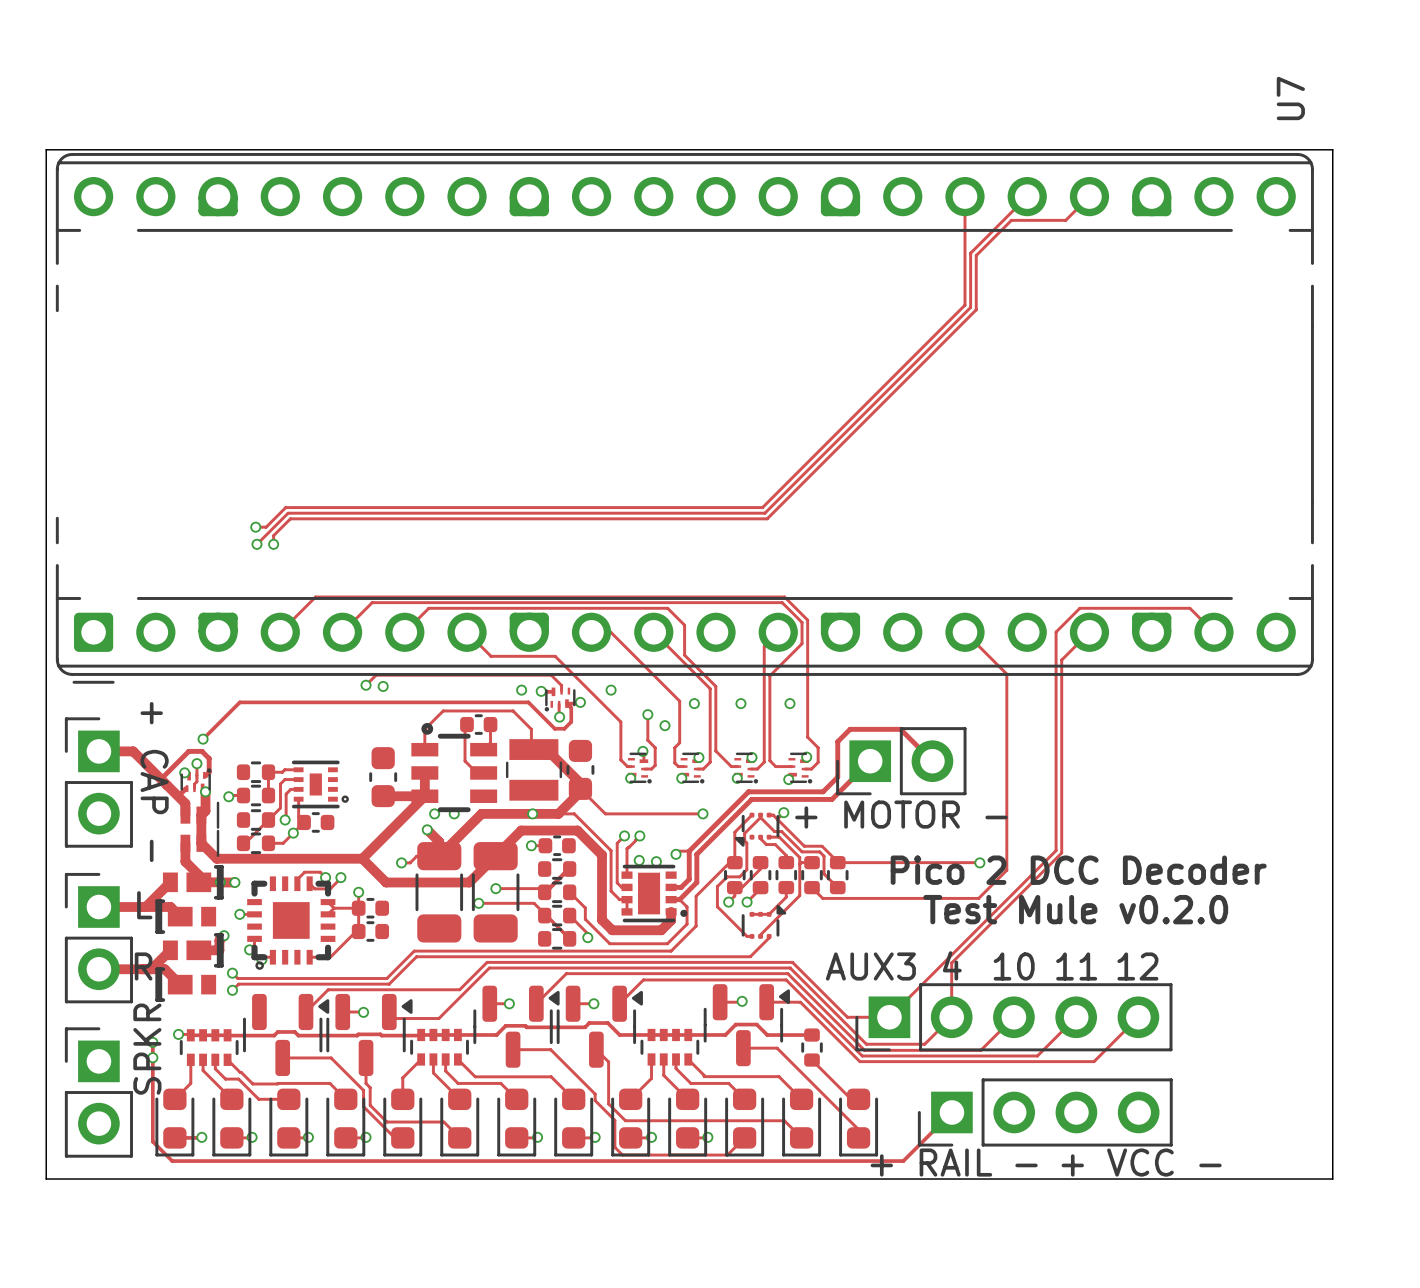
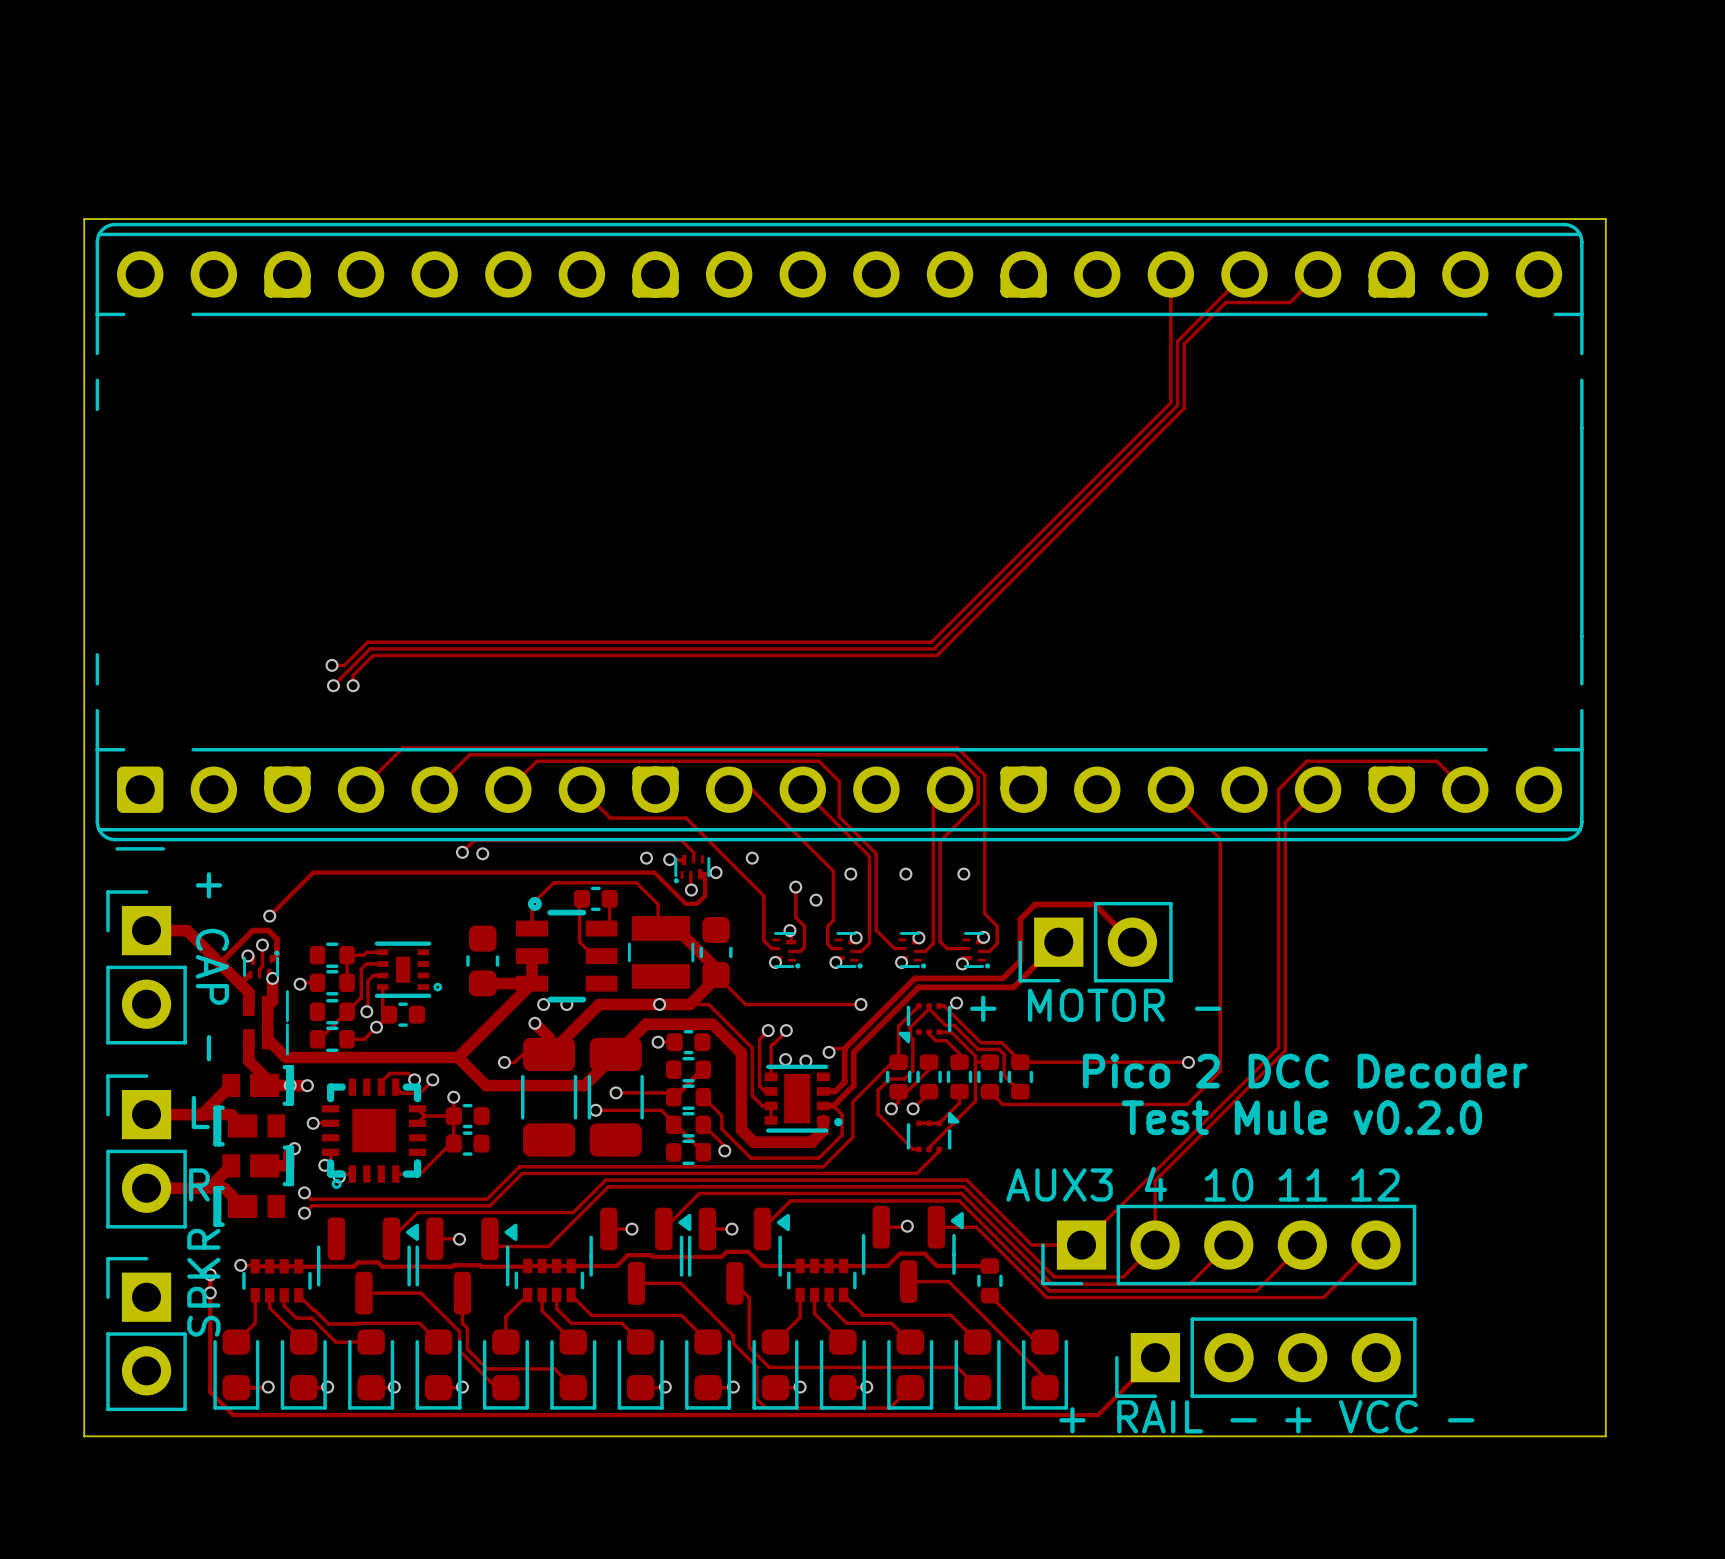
U7 name: U7 (1290, 98) -> none

